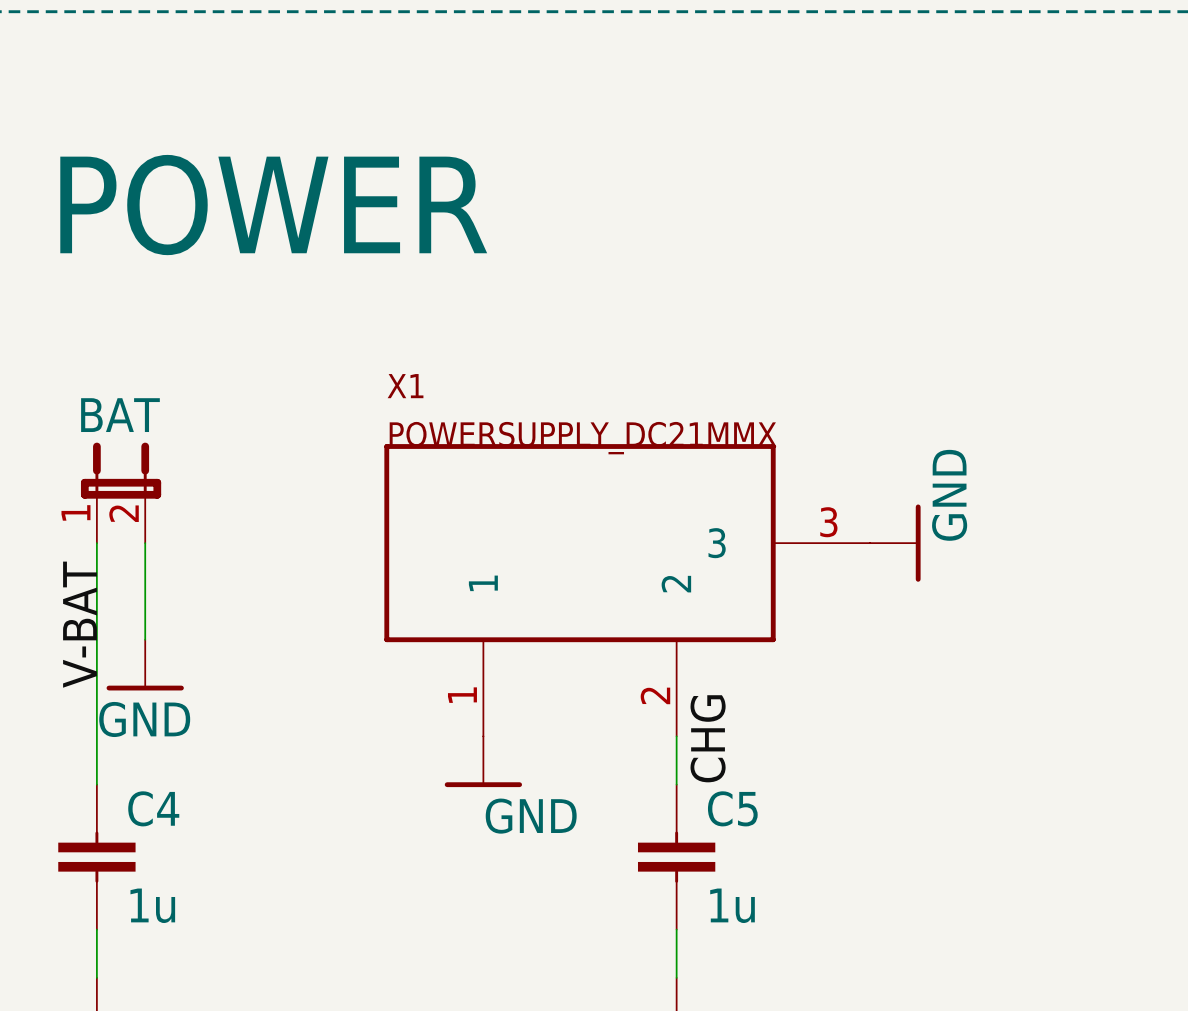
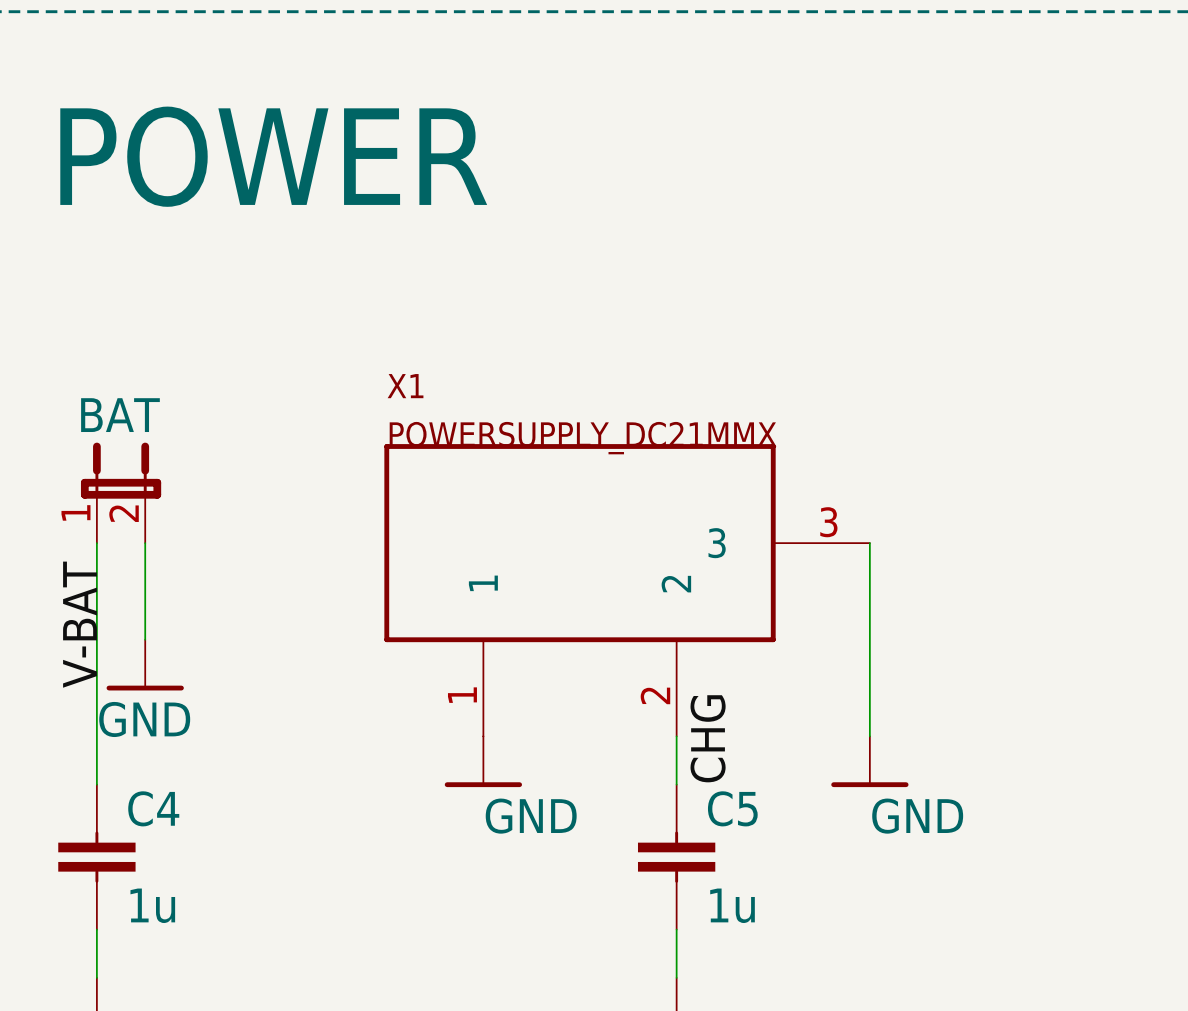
text position: POWER (273, 205) -> POWER (273, 156)
wire: none -> (869, 543) (869, 736)
power symbol position: GND (895, 543) -> GND (869, 761)
power symbol rotation: 0° (918, 543) -> 90° clockwise (869, 784)

